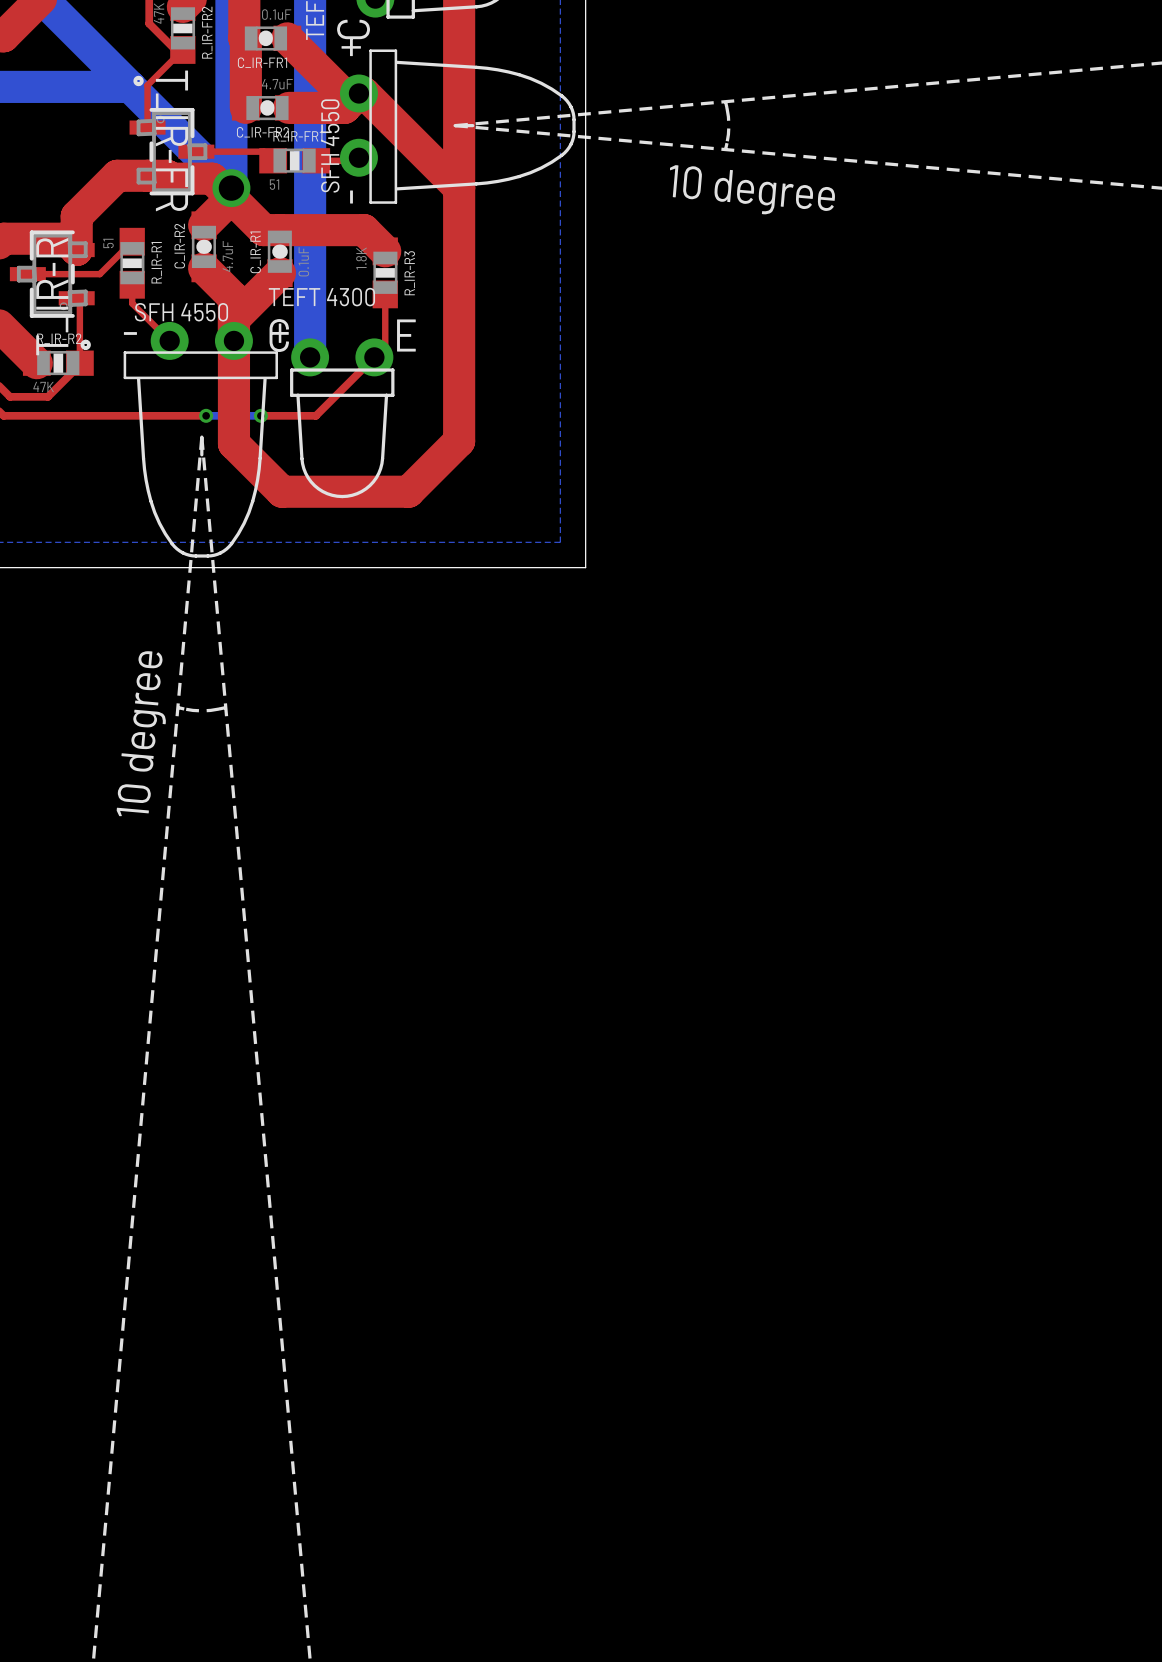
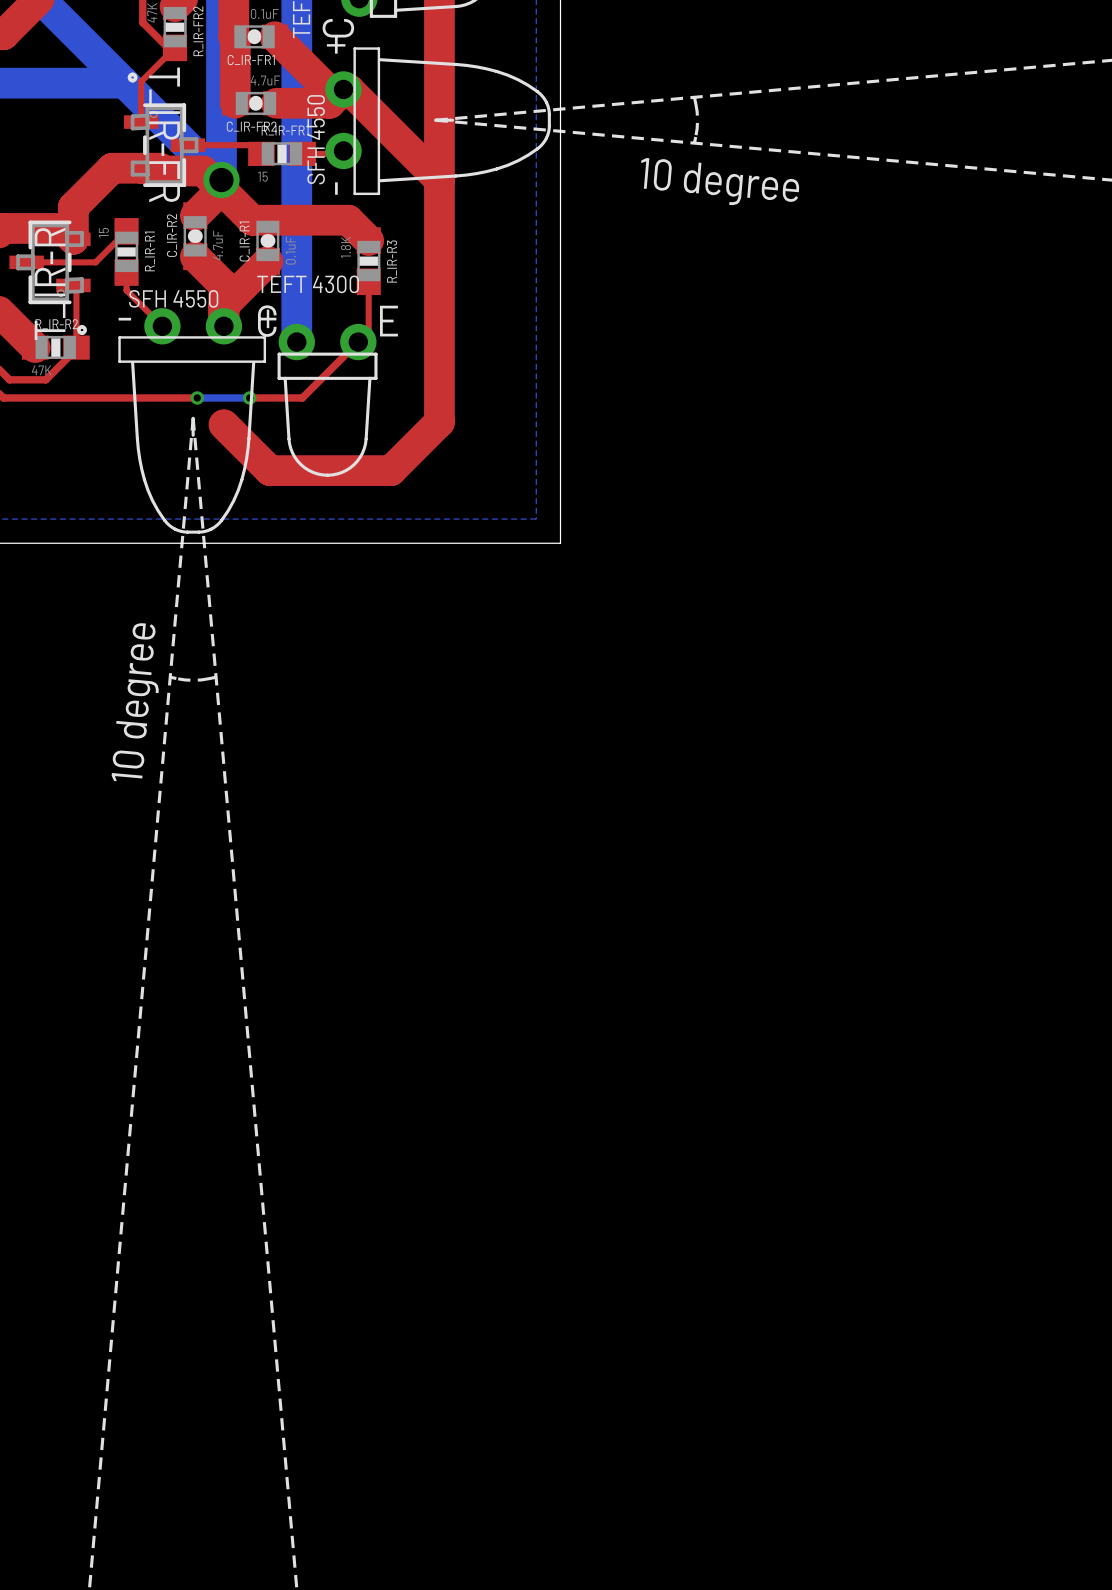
R_IR-FR1 value: 51 (274, 184) -> 15 (262, 176)
R_IR-R1 value: 51 (108, 243) -> 15 (103, 232)
top track: (233, 340) (233, 443) -> none

